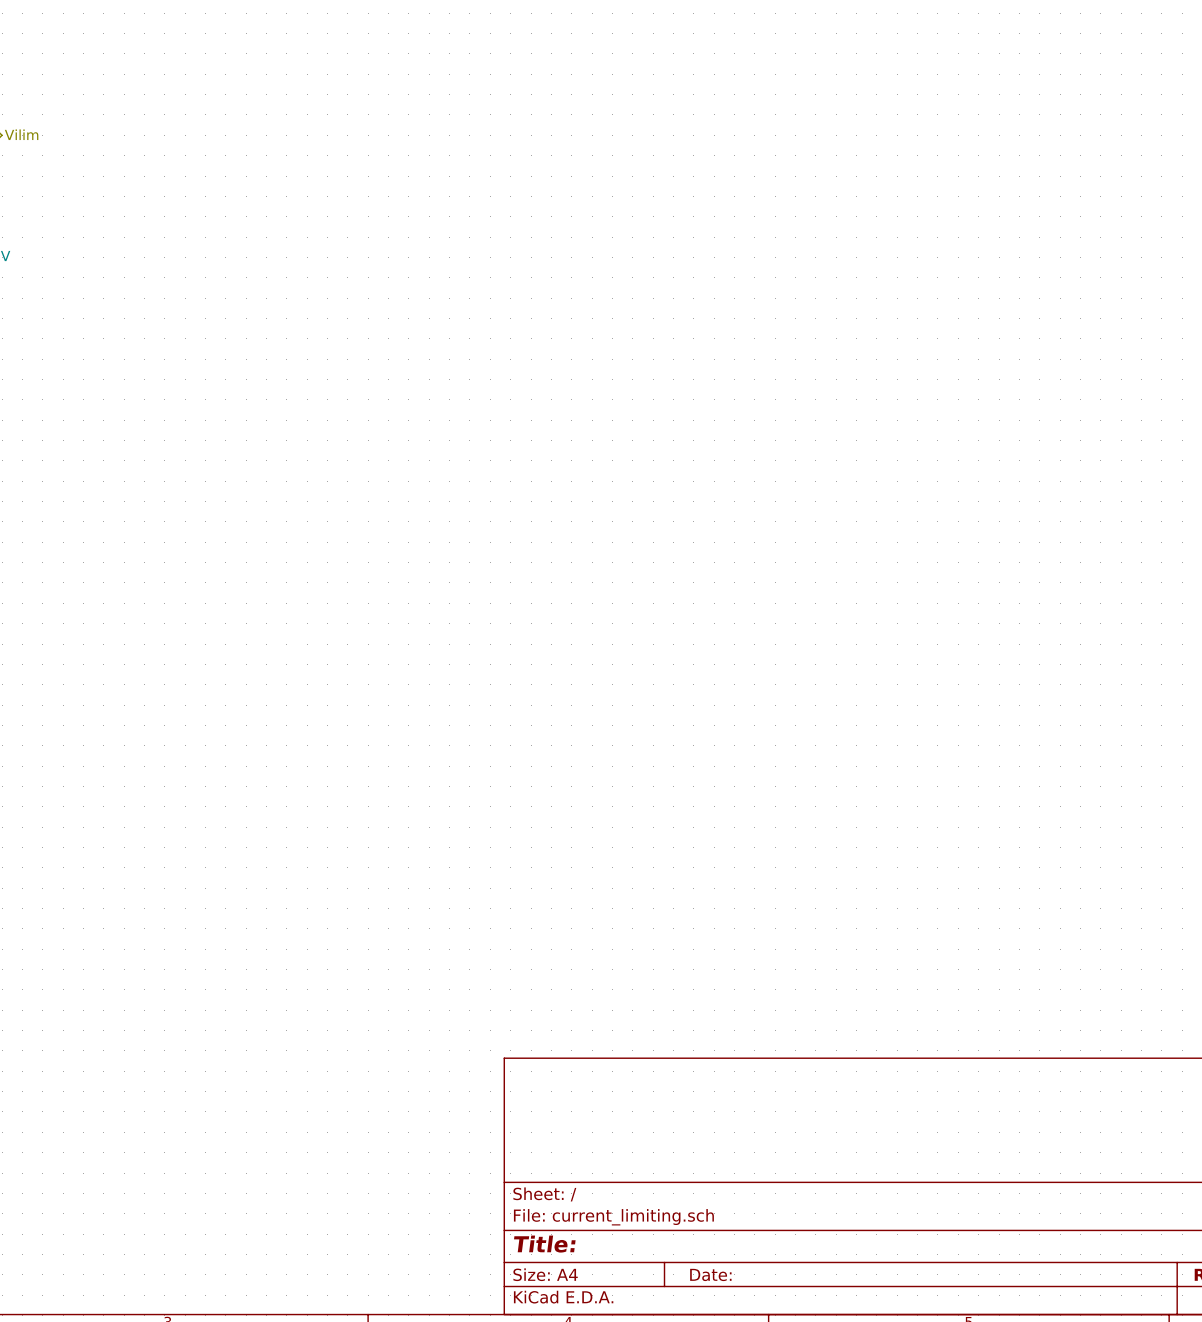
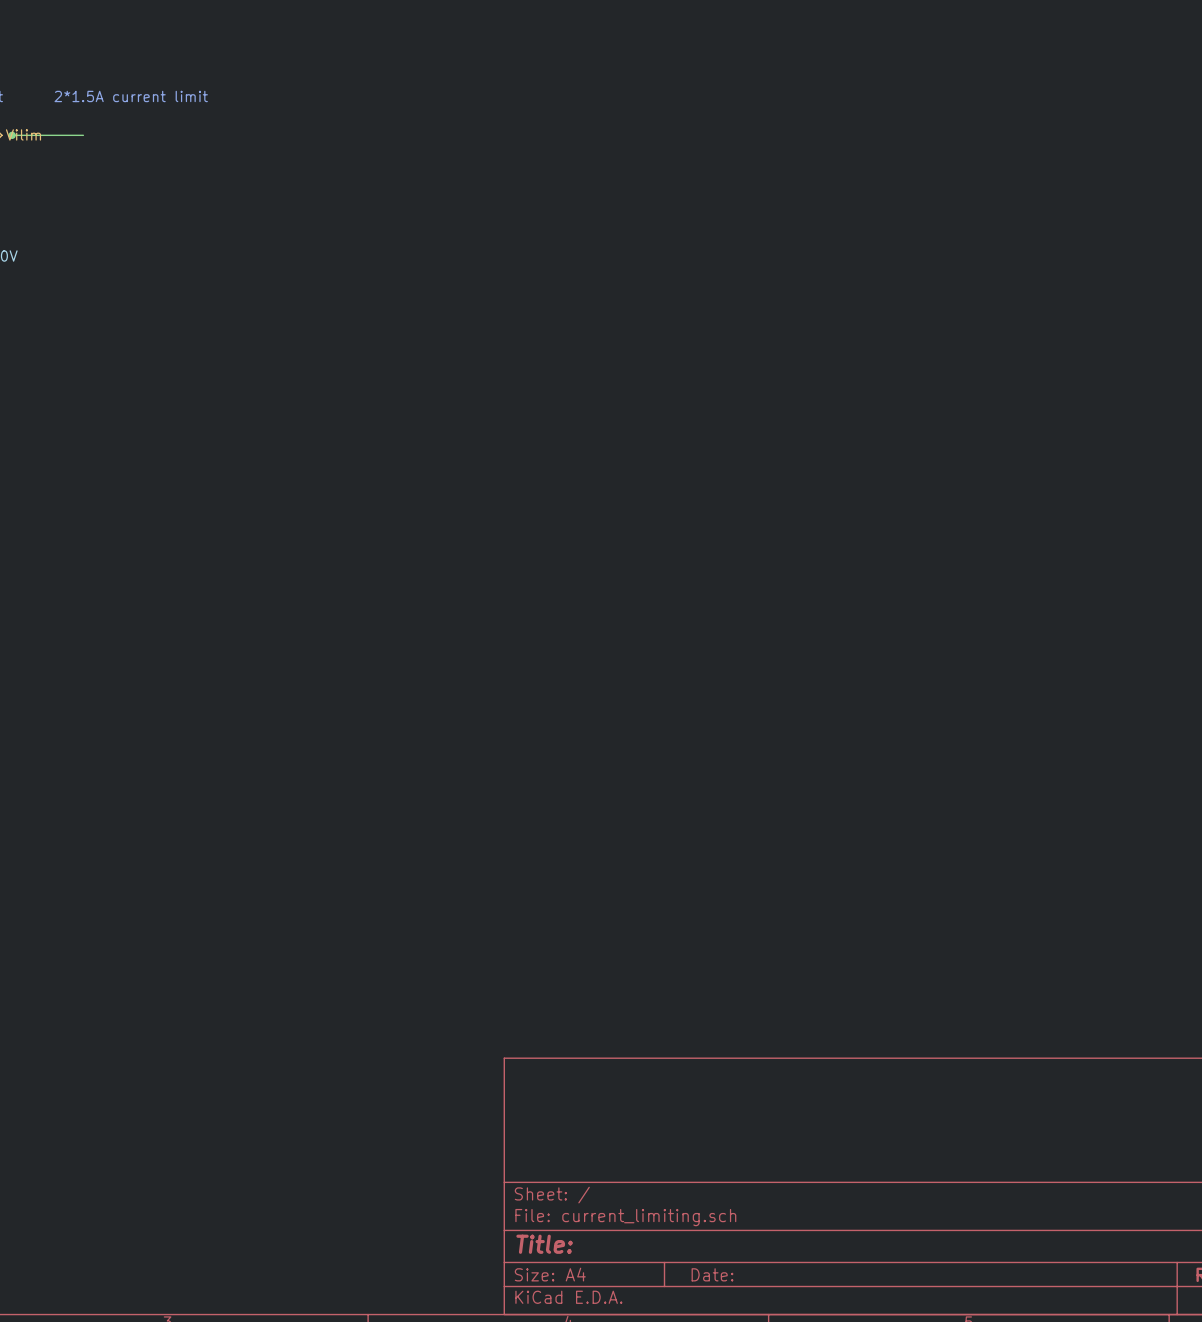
text: none -> 2*1.5A current limit (131, 96)
wire: none -> (12, 135) (83, 135)
junction: none -> (12, 135)

